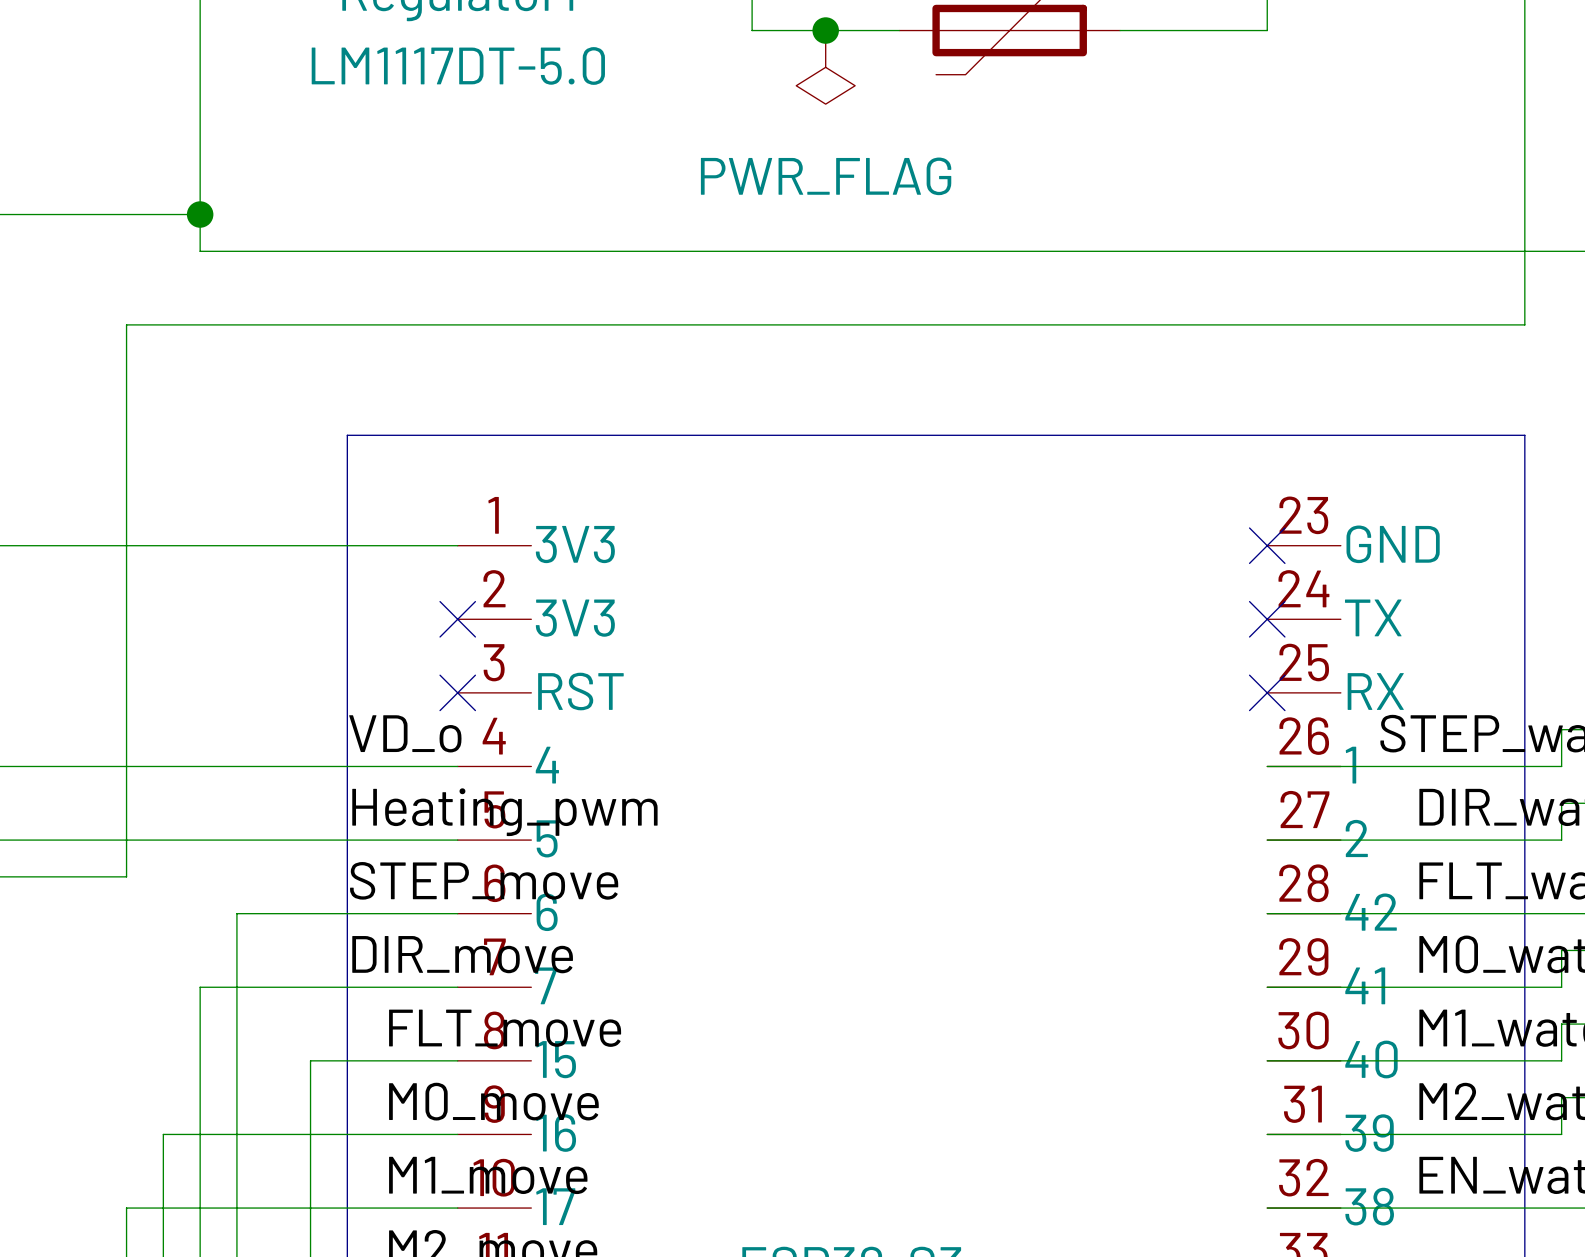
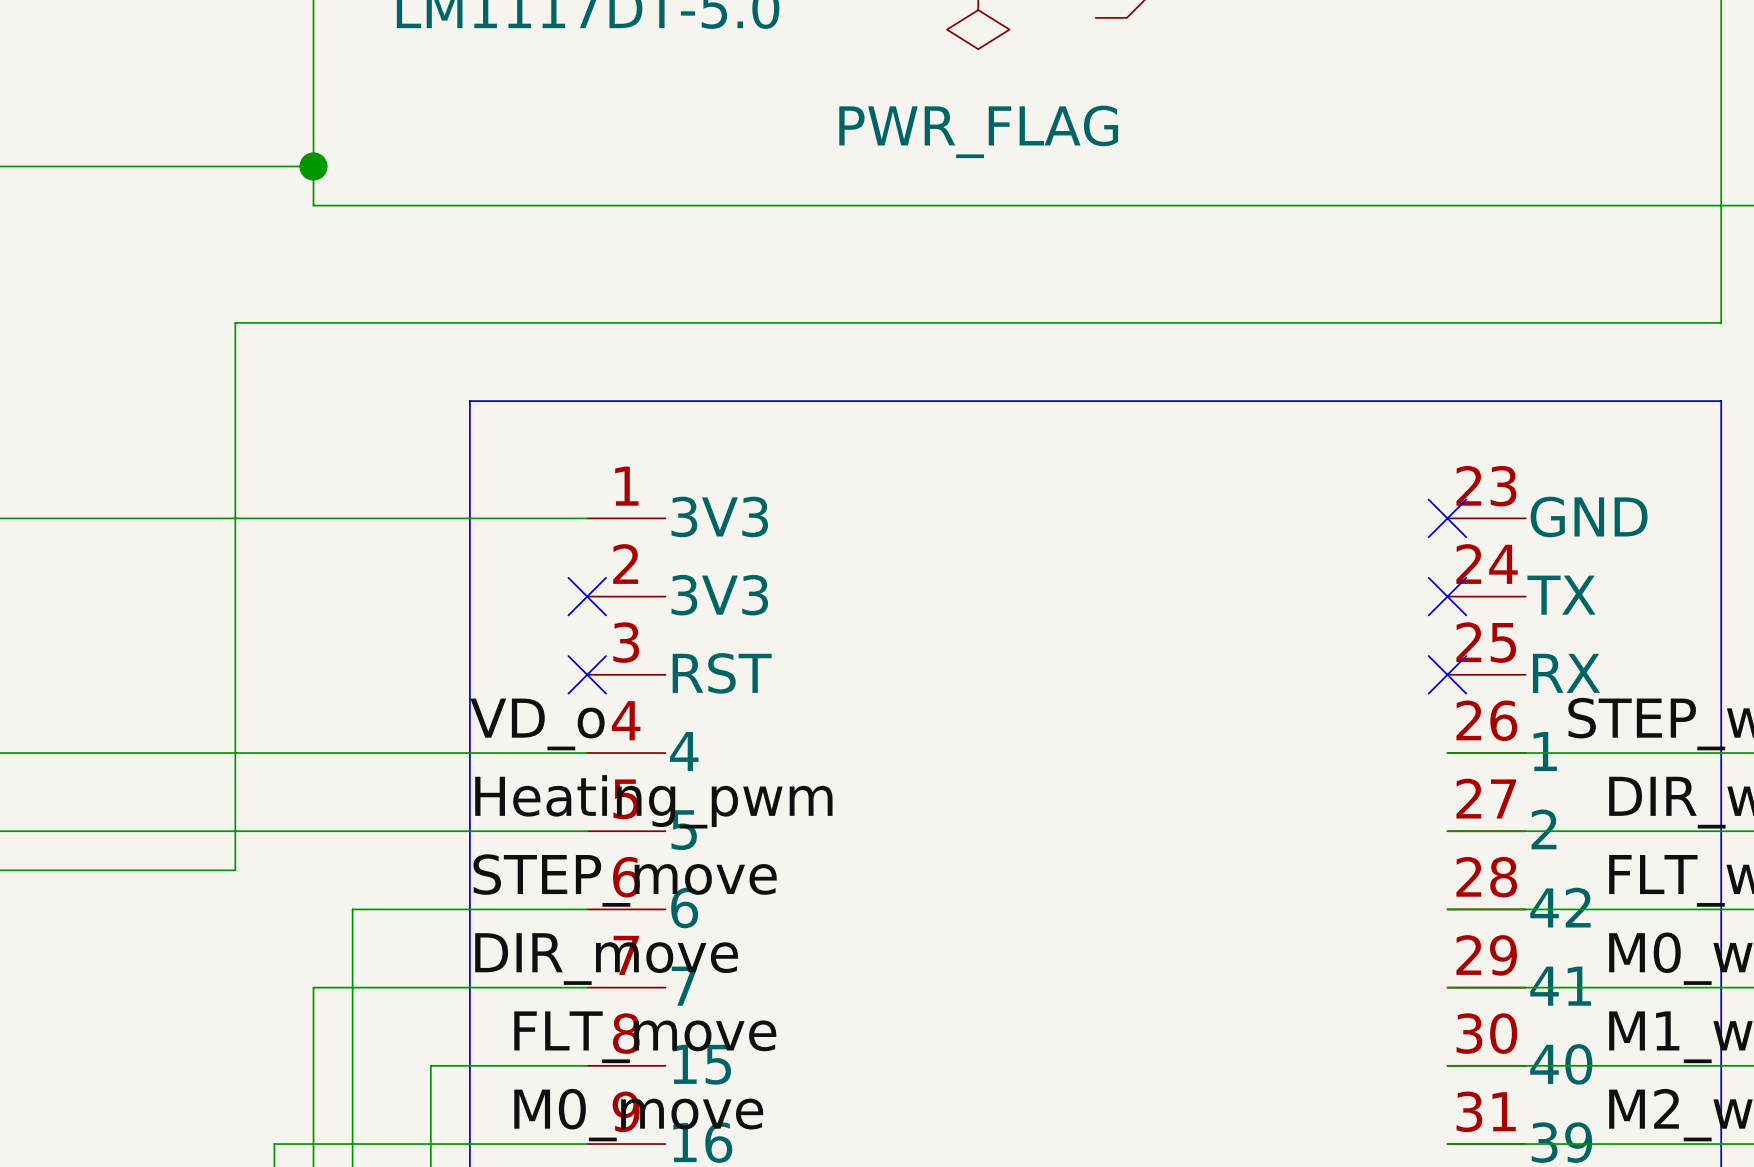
wire: (1524, 324) (126, 324) (126, 361) -> (1721, 283) (1721, 322) (235, 322)

